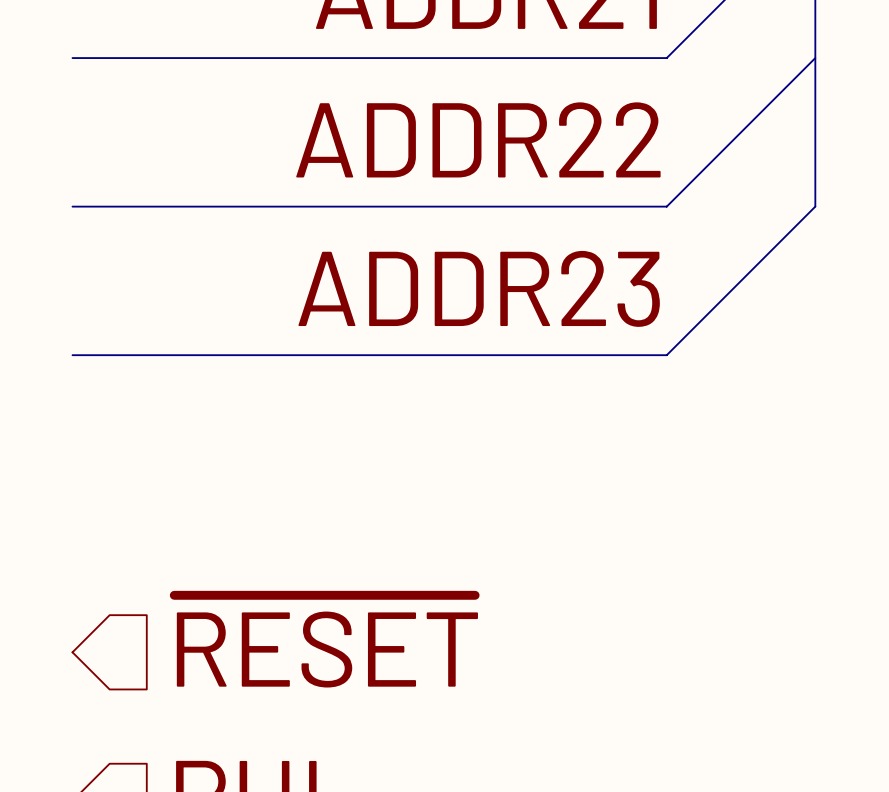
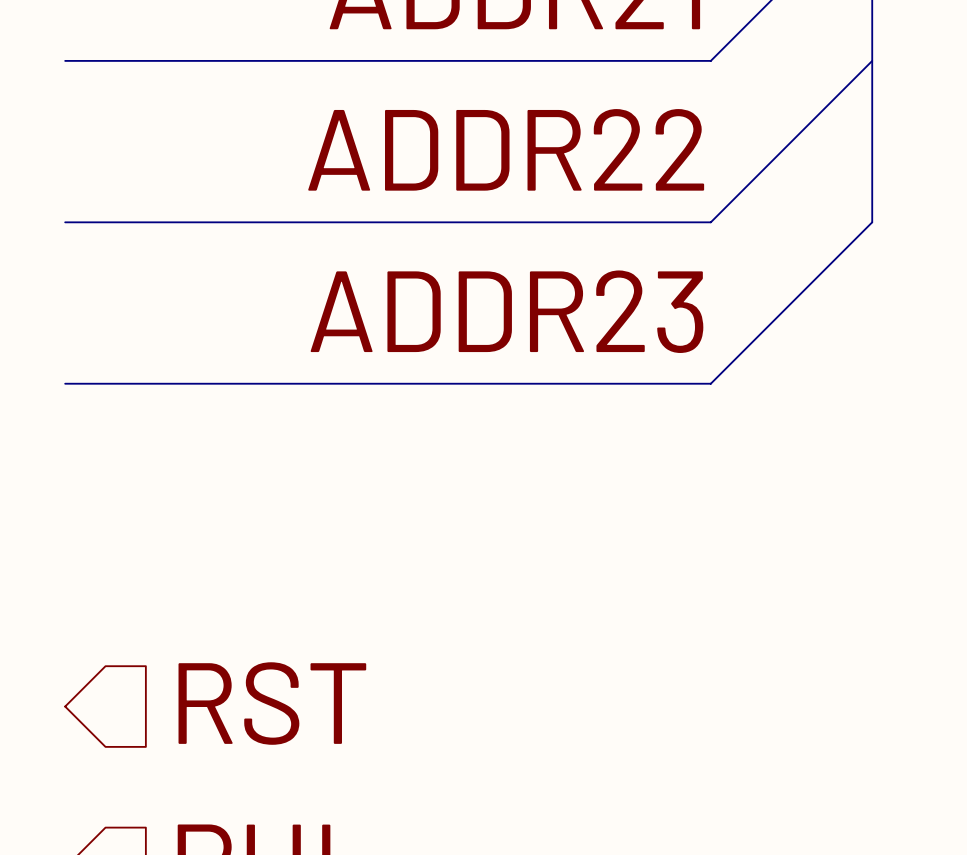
hierarchical label: ~{RESET} (326, 641) -> RST (272, 703)

